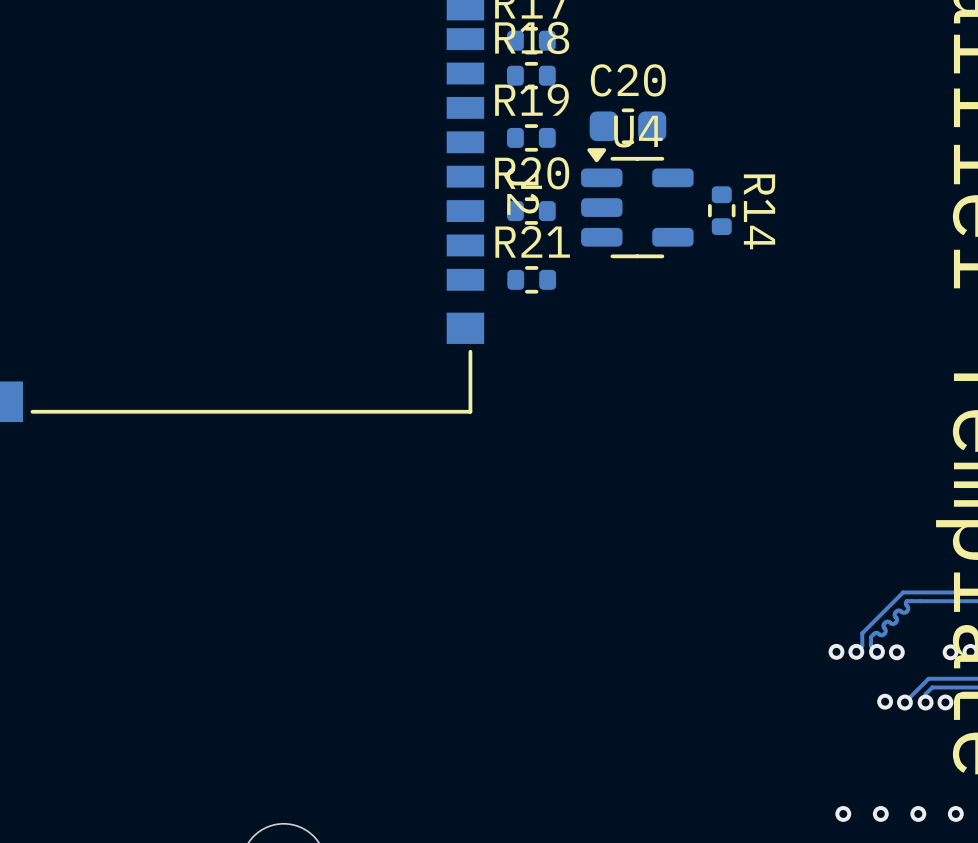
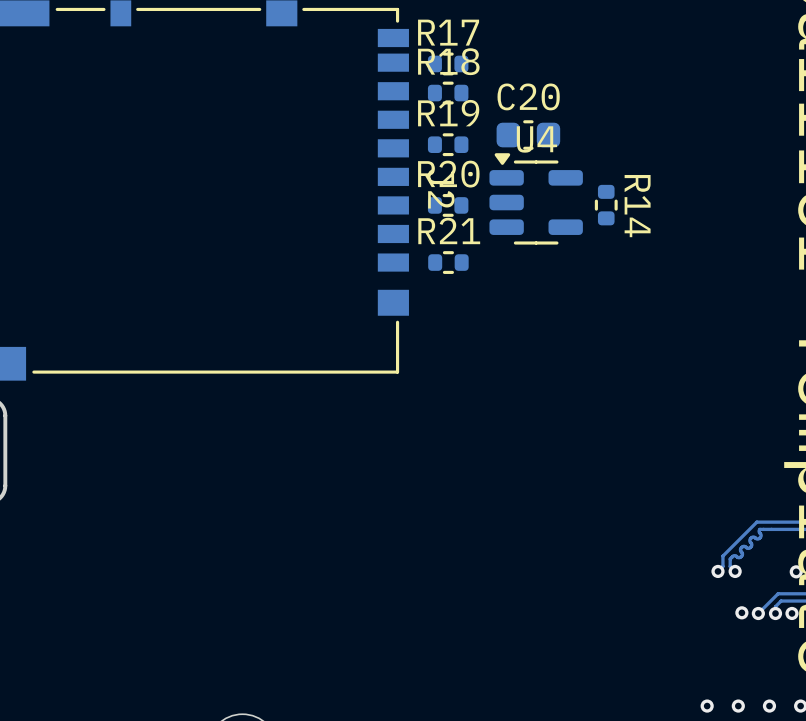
via: (836, 651) -> none
via: (896, 652) -> none

